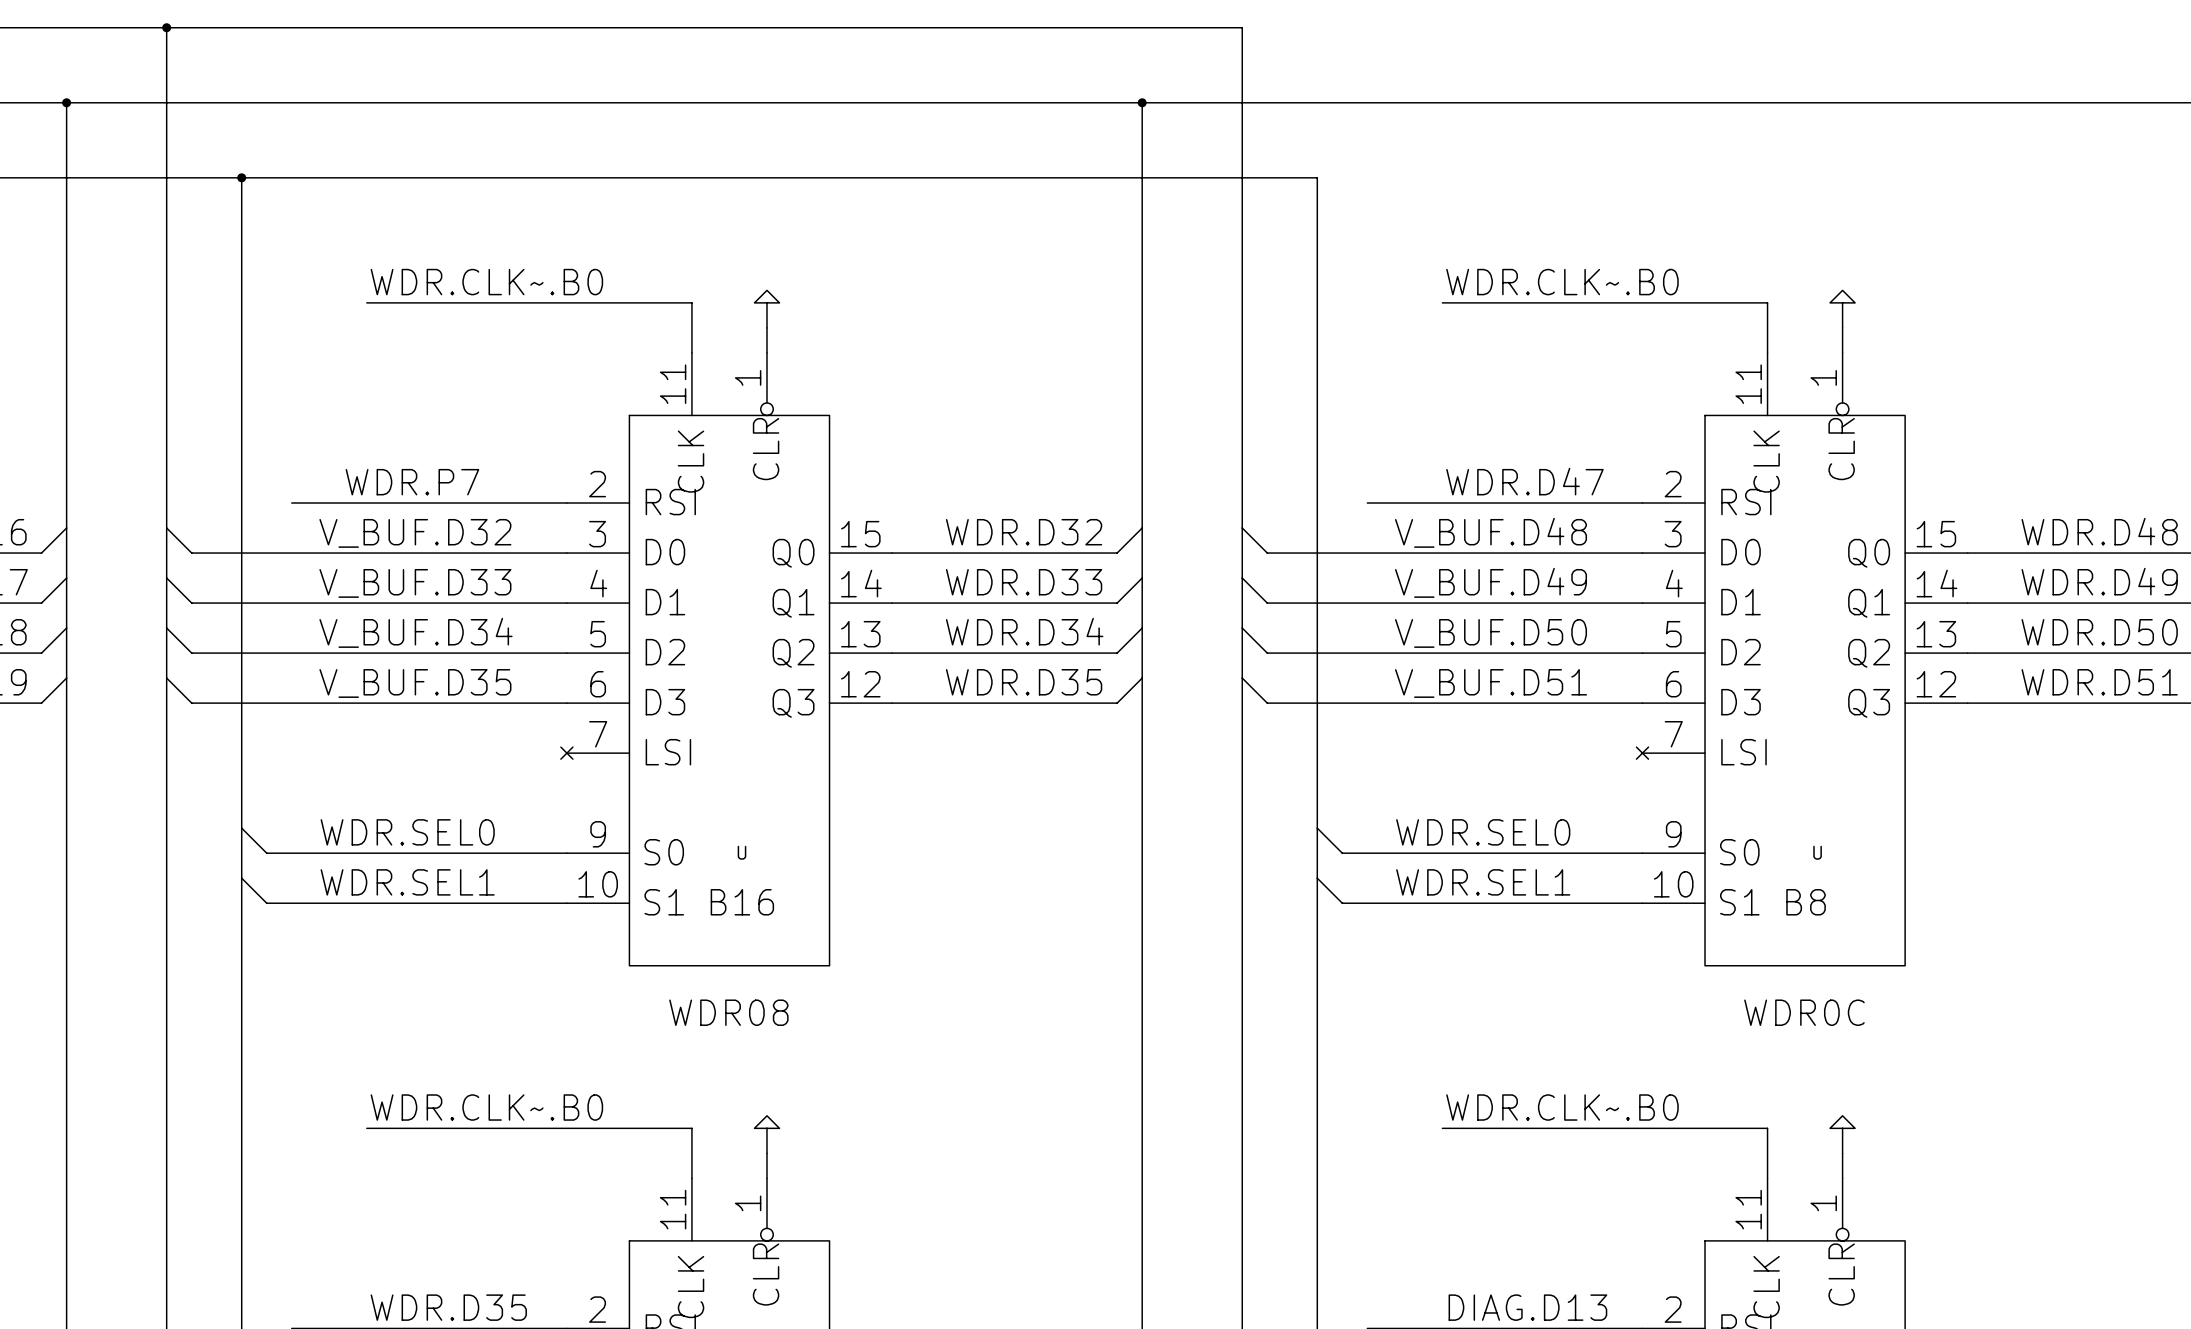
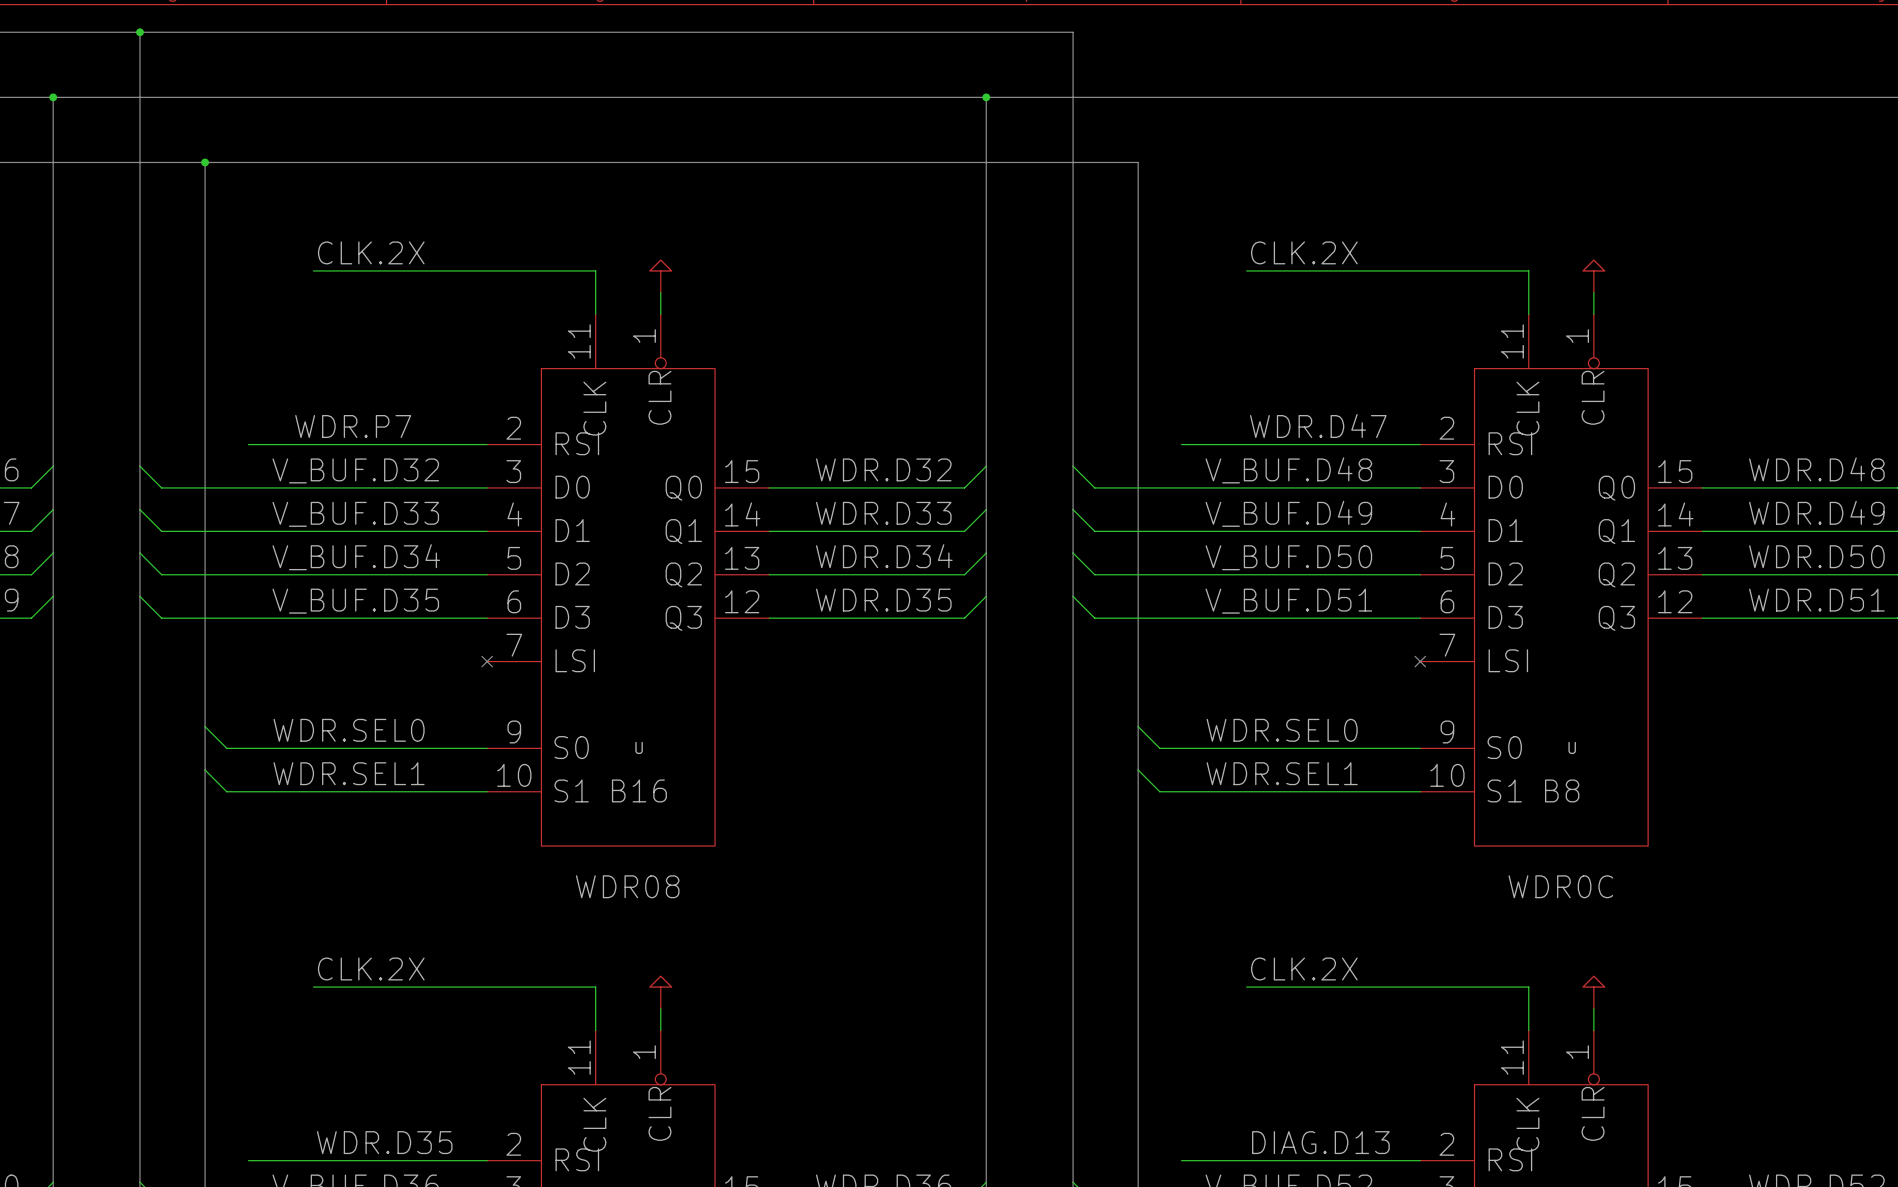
label: WDR.CLK~.B0 (486, 282) -> CLK.2X (371, 252)
label: WDR.CLK~.B0 (1562, 282) -> CLK.2X (1304, 252)
label: WDR.CLK~.B0 (486, 1107) -> CLK.2X (371, 969)
label: WDR.CLK~.B0 (1562, 1107) -> CLK.2X (1304, 969)

